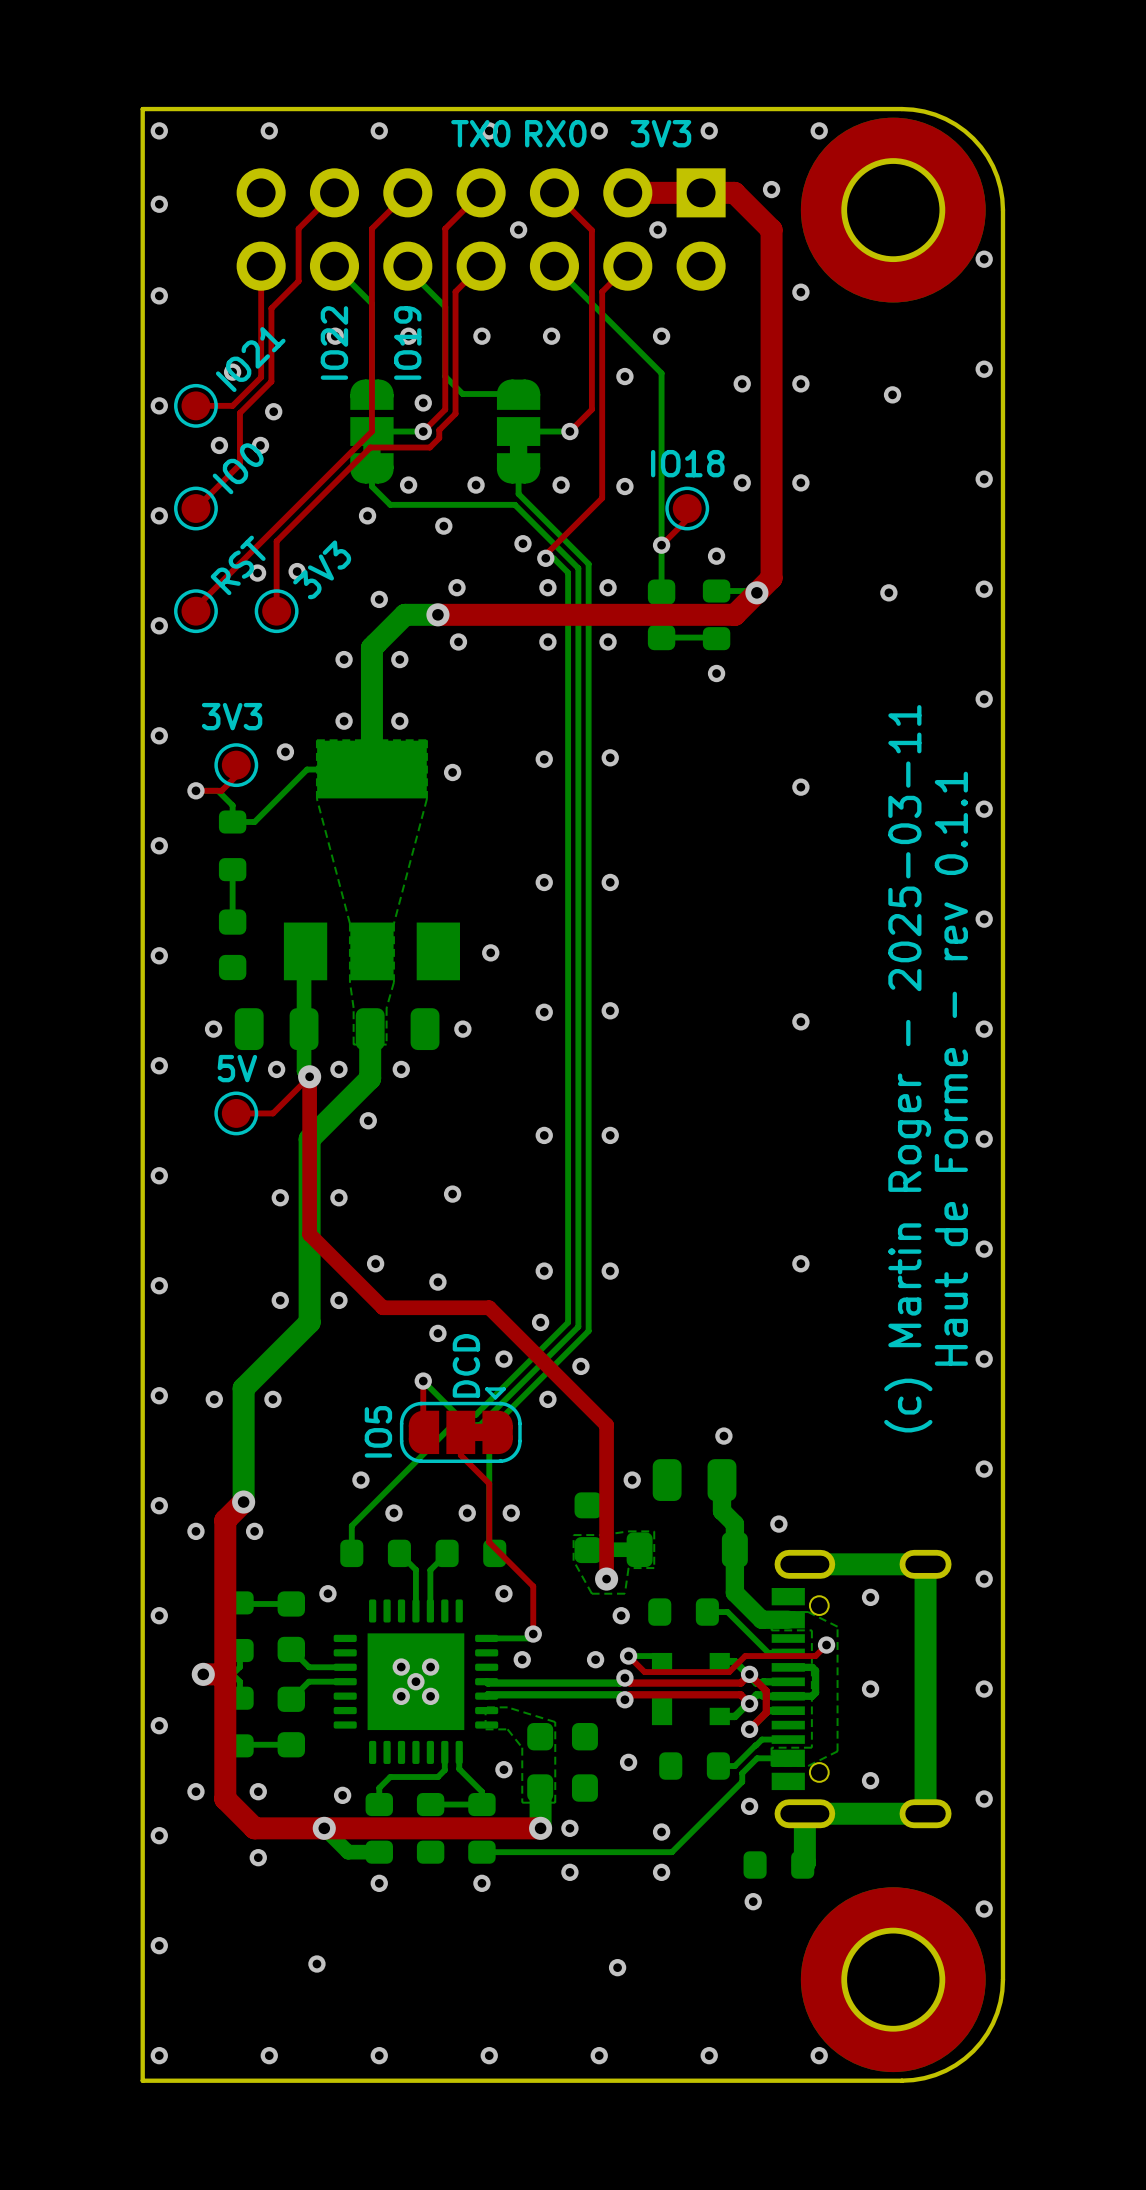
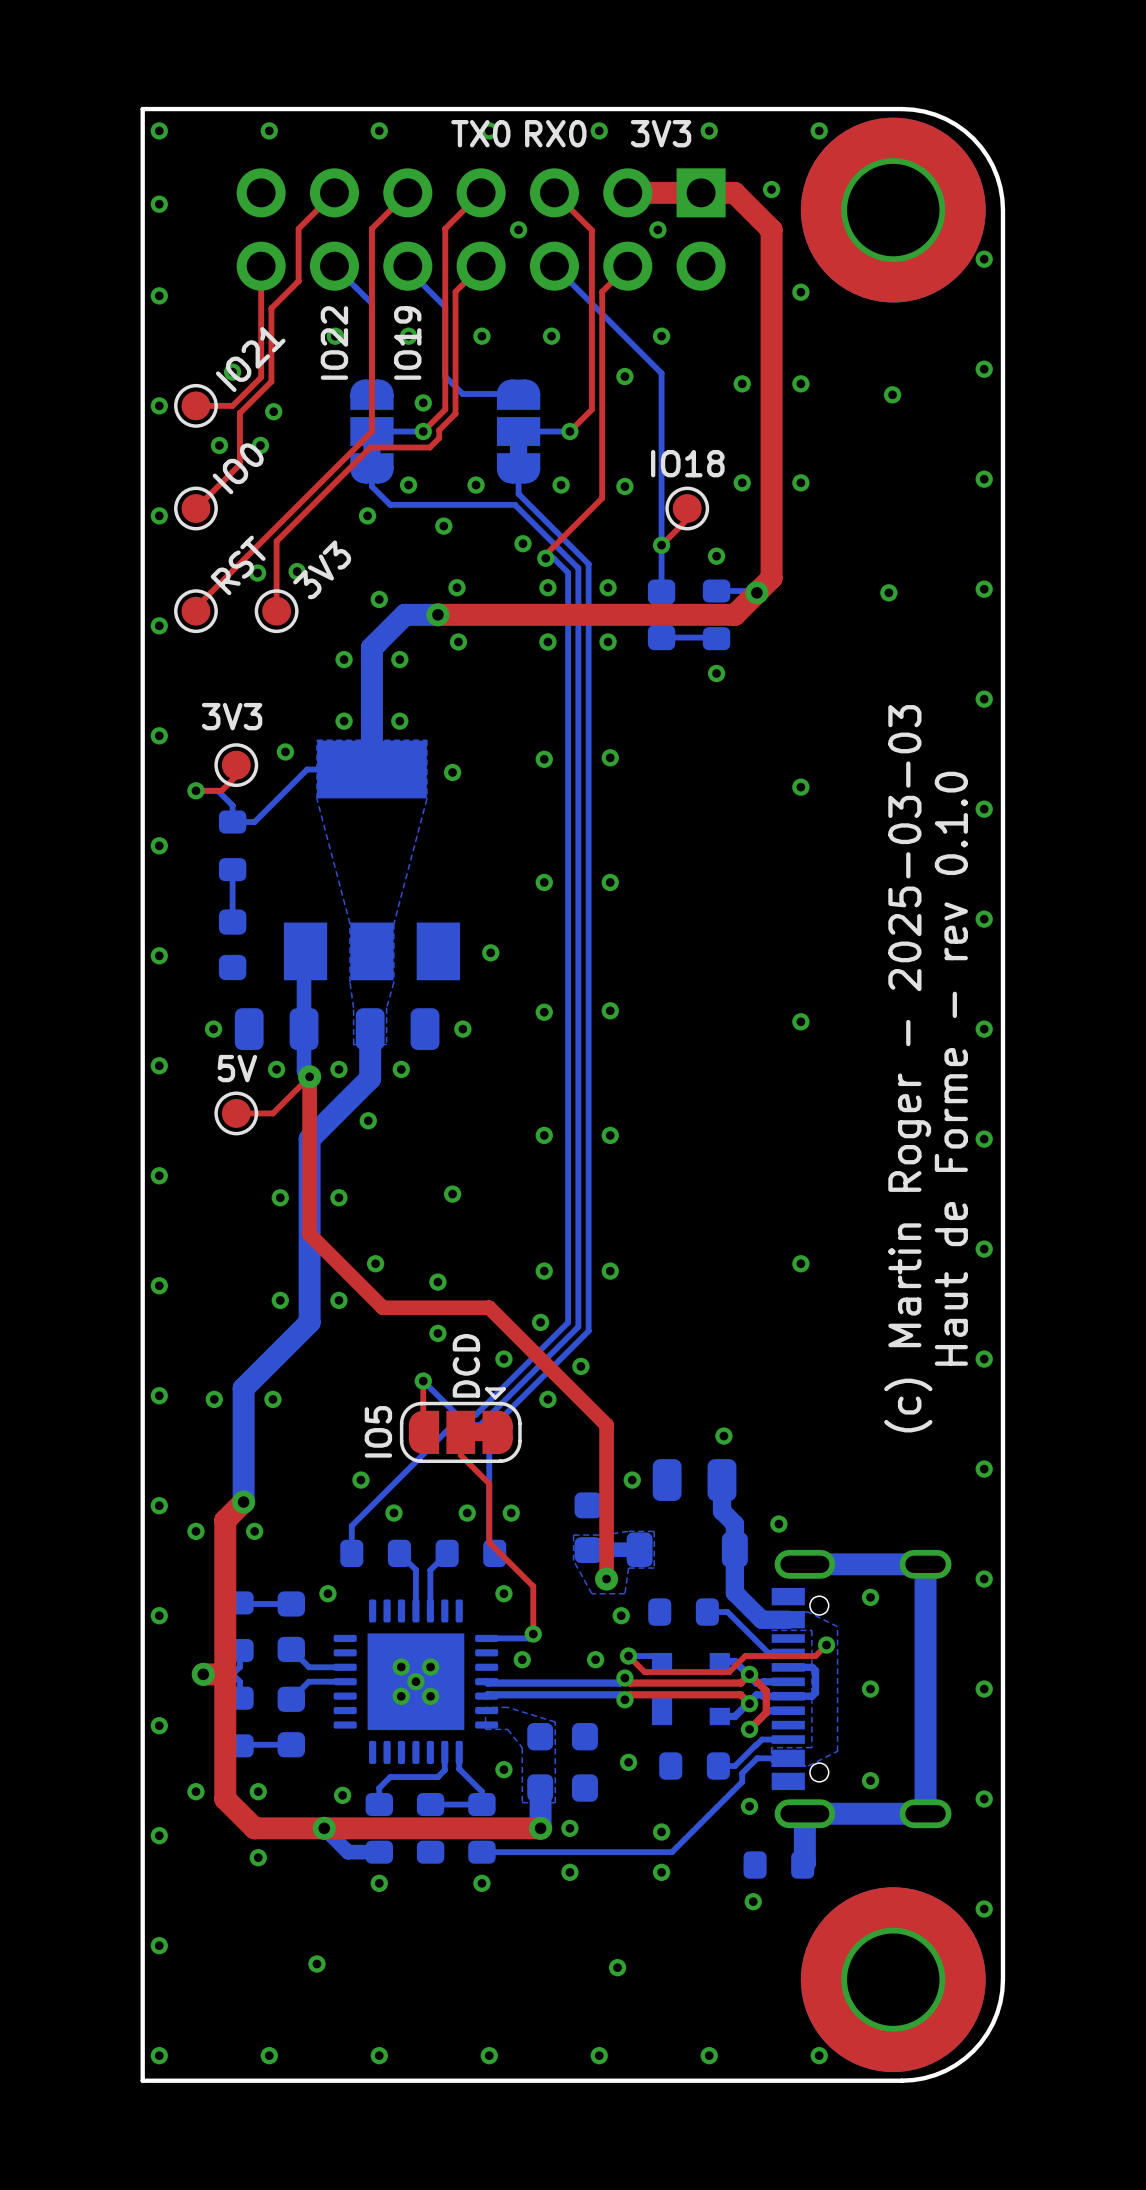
text: (c) Martin Roger - 2025-03-11 (908, 1068) -> (c) Martin Roger - 2025-03-03 (908, 1068)
text: Haut de Forme - rev 0.1.1 (951, 1068) -> Haut de Forme - rev 0.1.0 (951, 1068)

